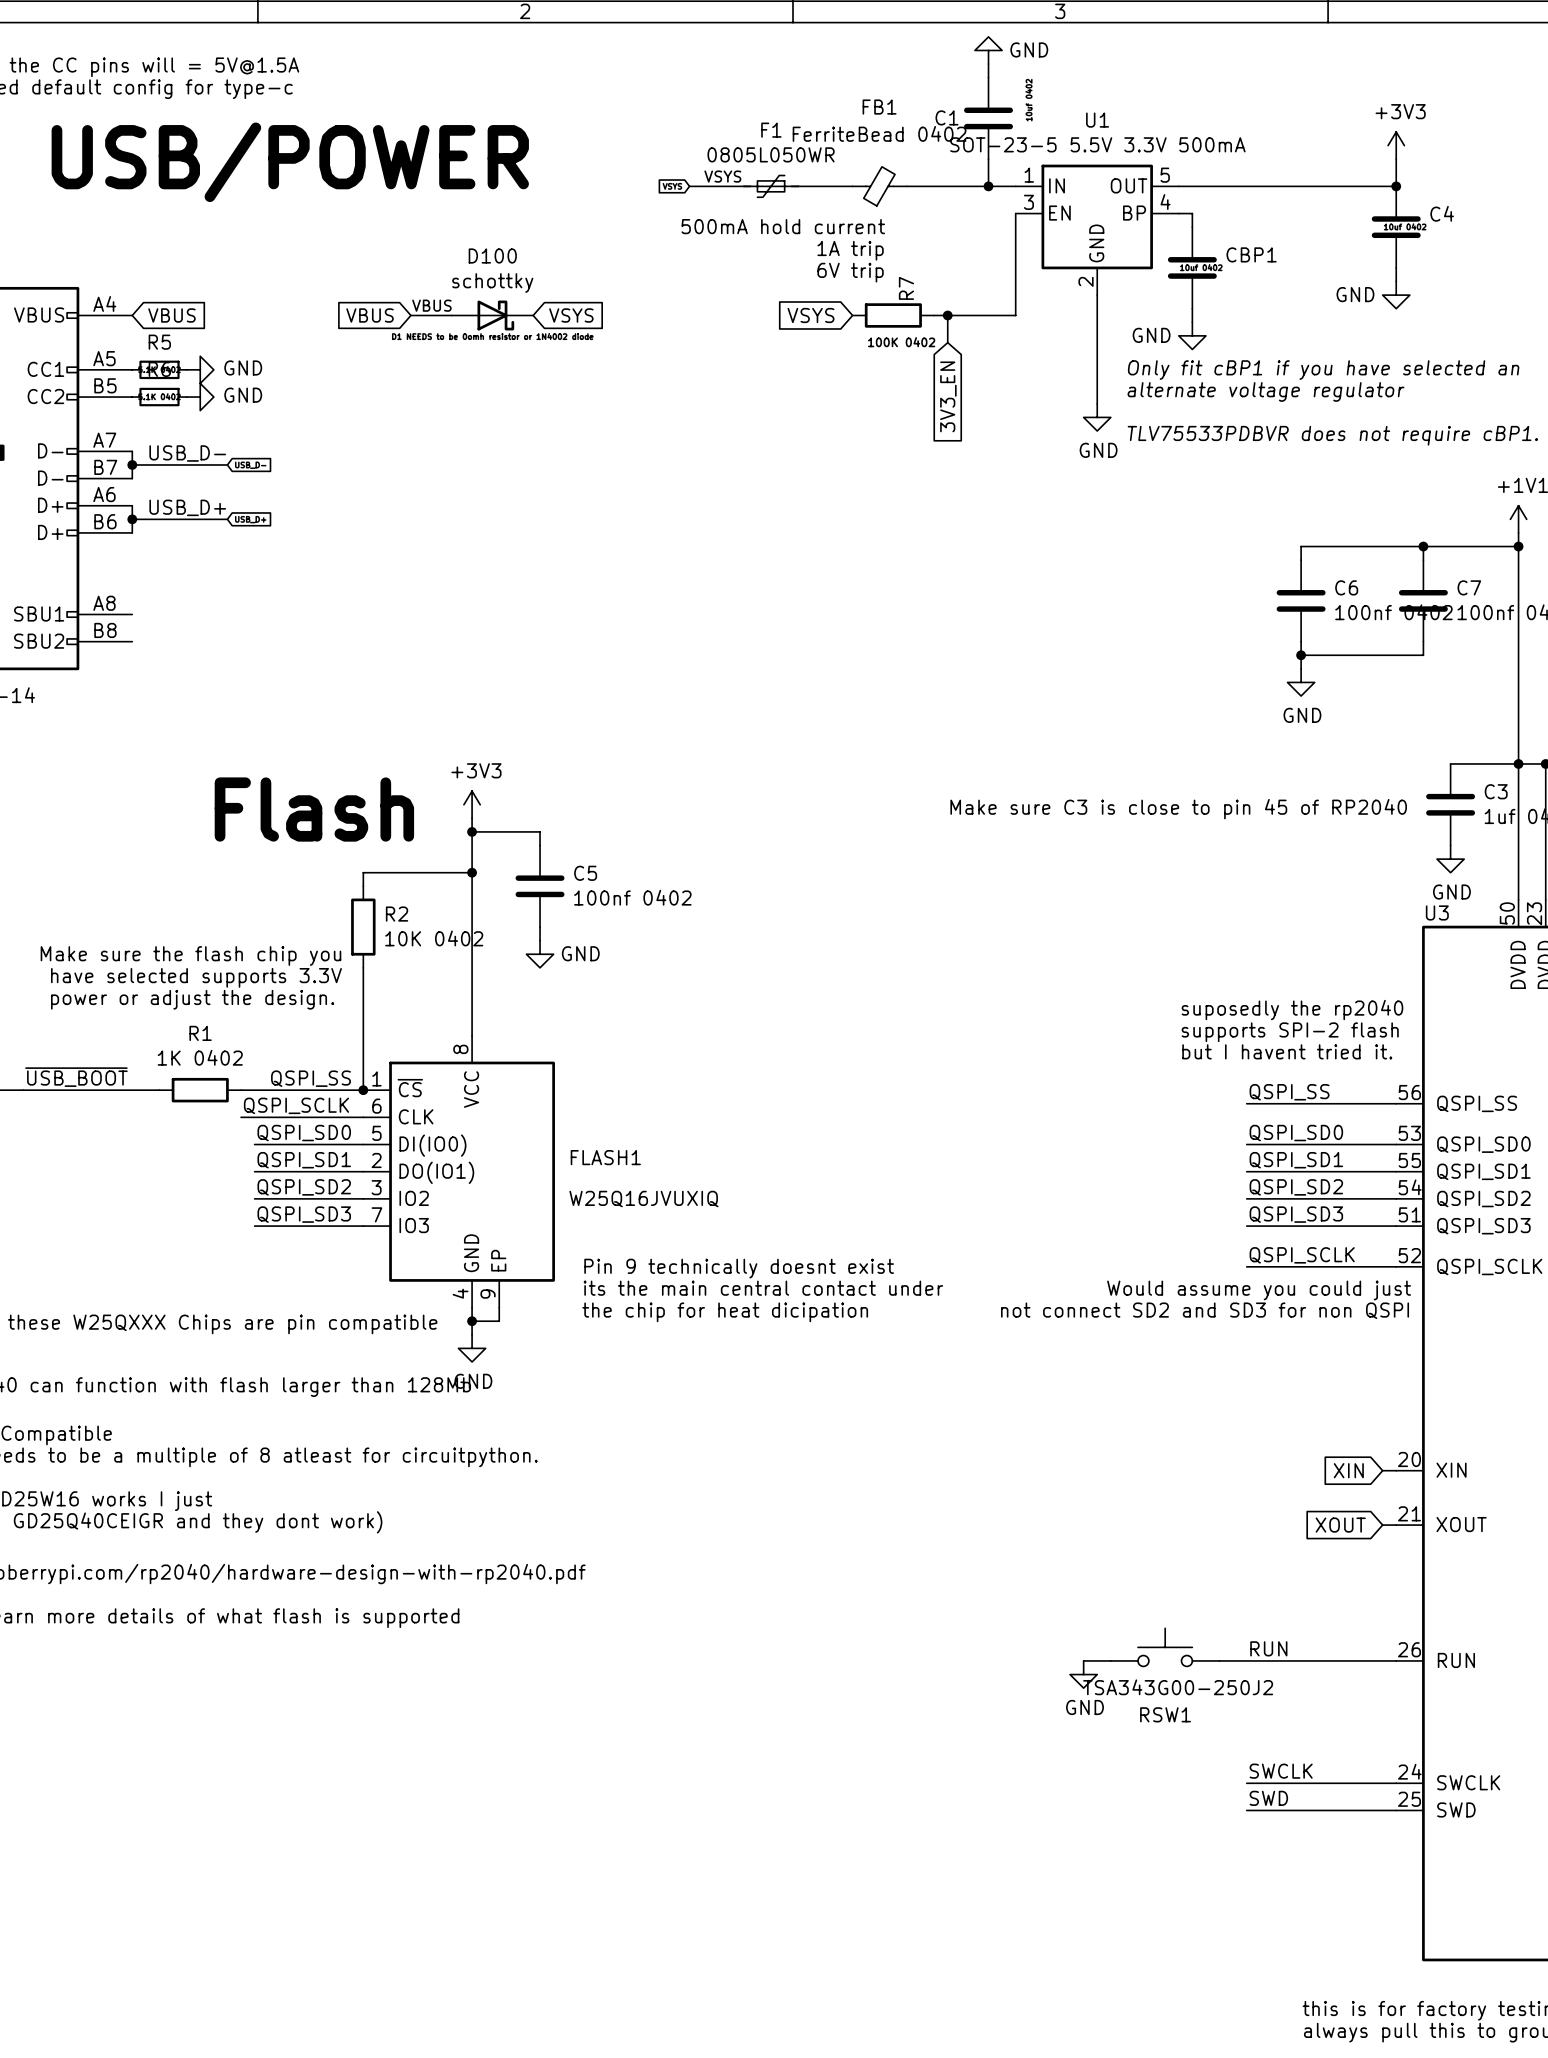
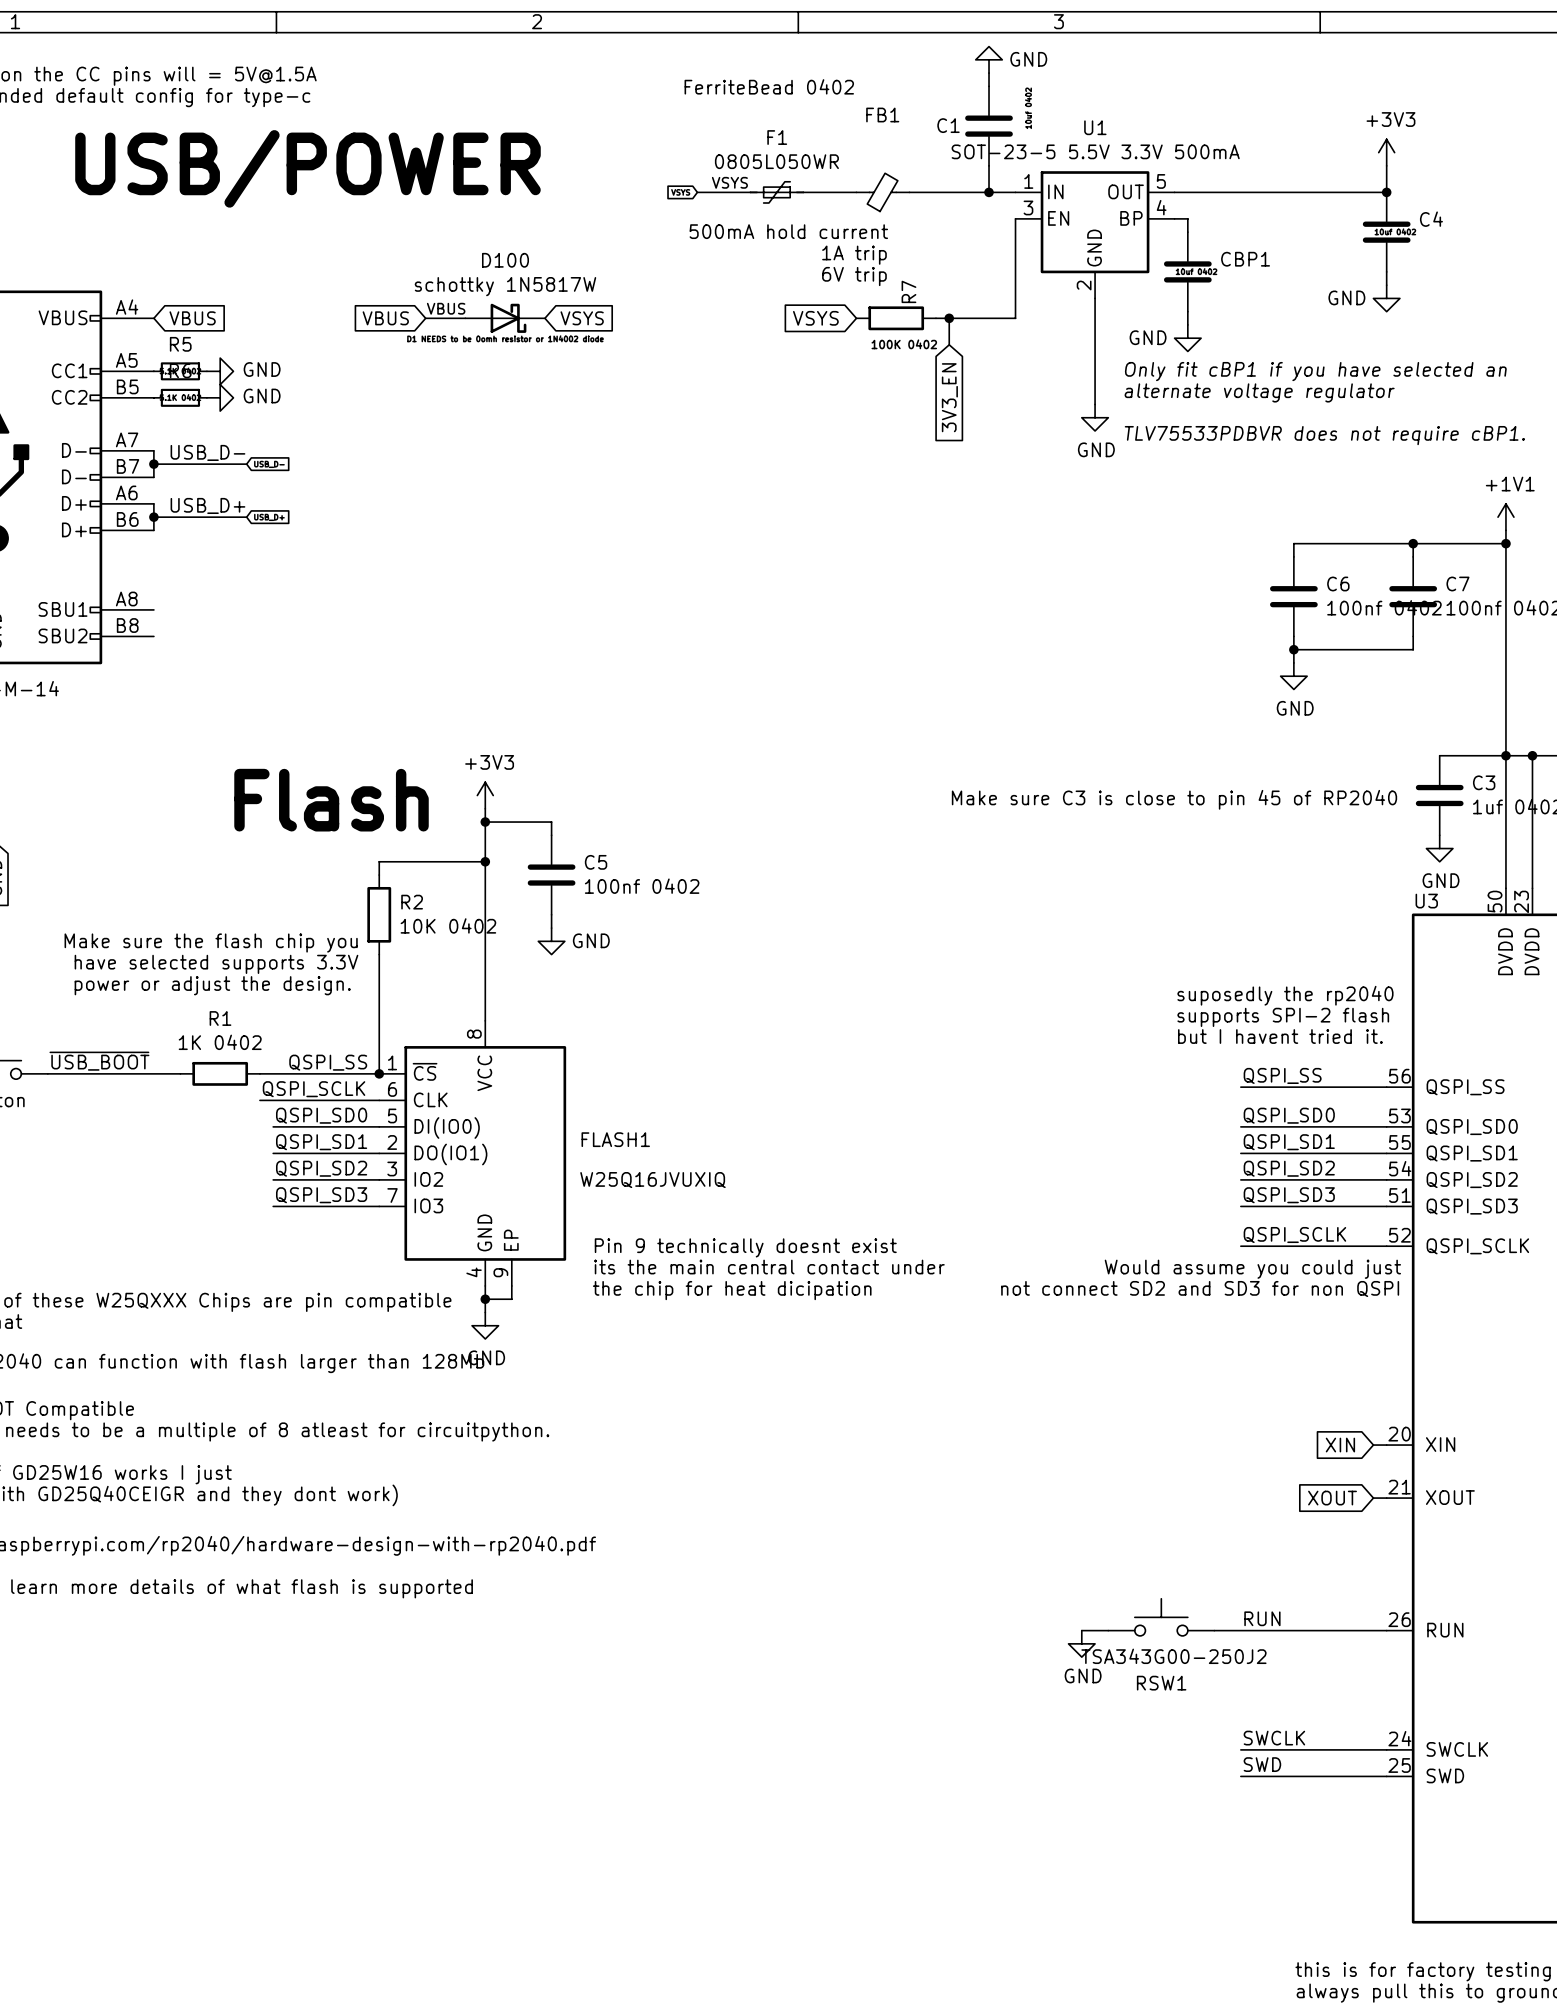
FB1 value position: FerriteBead 0402 (879, 133) -> FerriteBead 0402 (769, 86)
D100 value: schottky (492, 283) -> schottky 1N5817W (505, 286)

